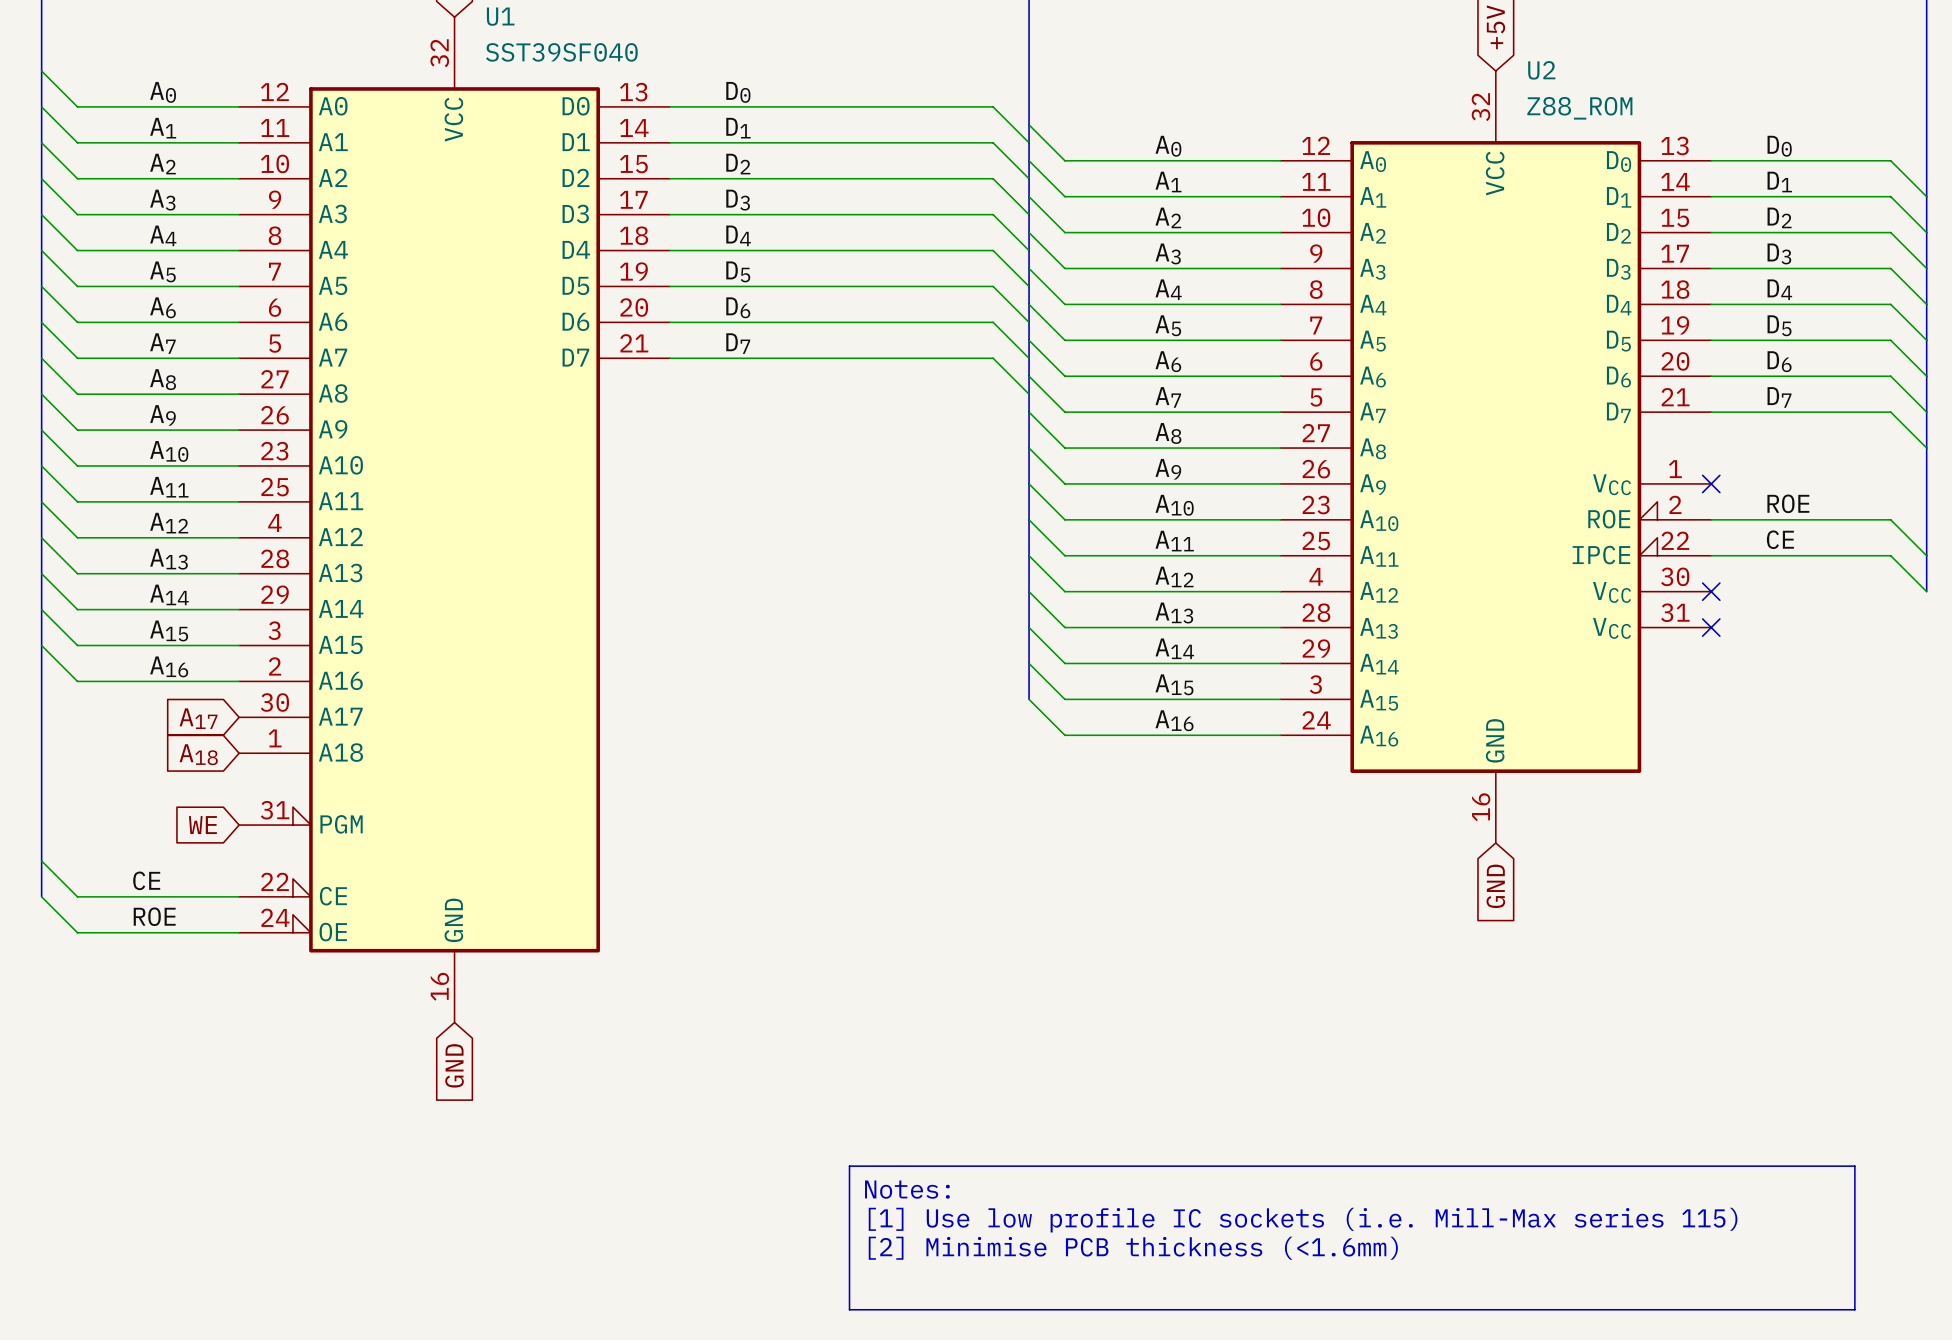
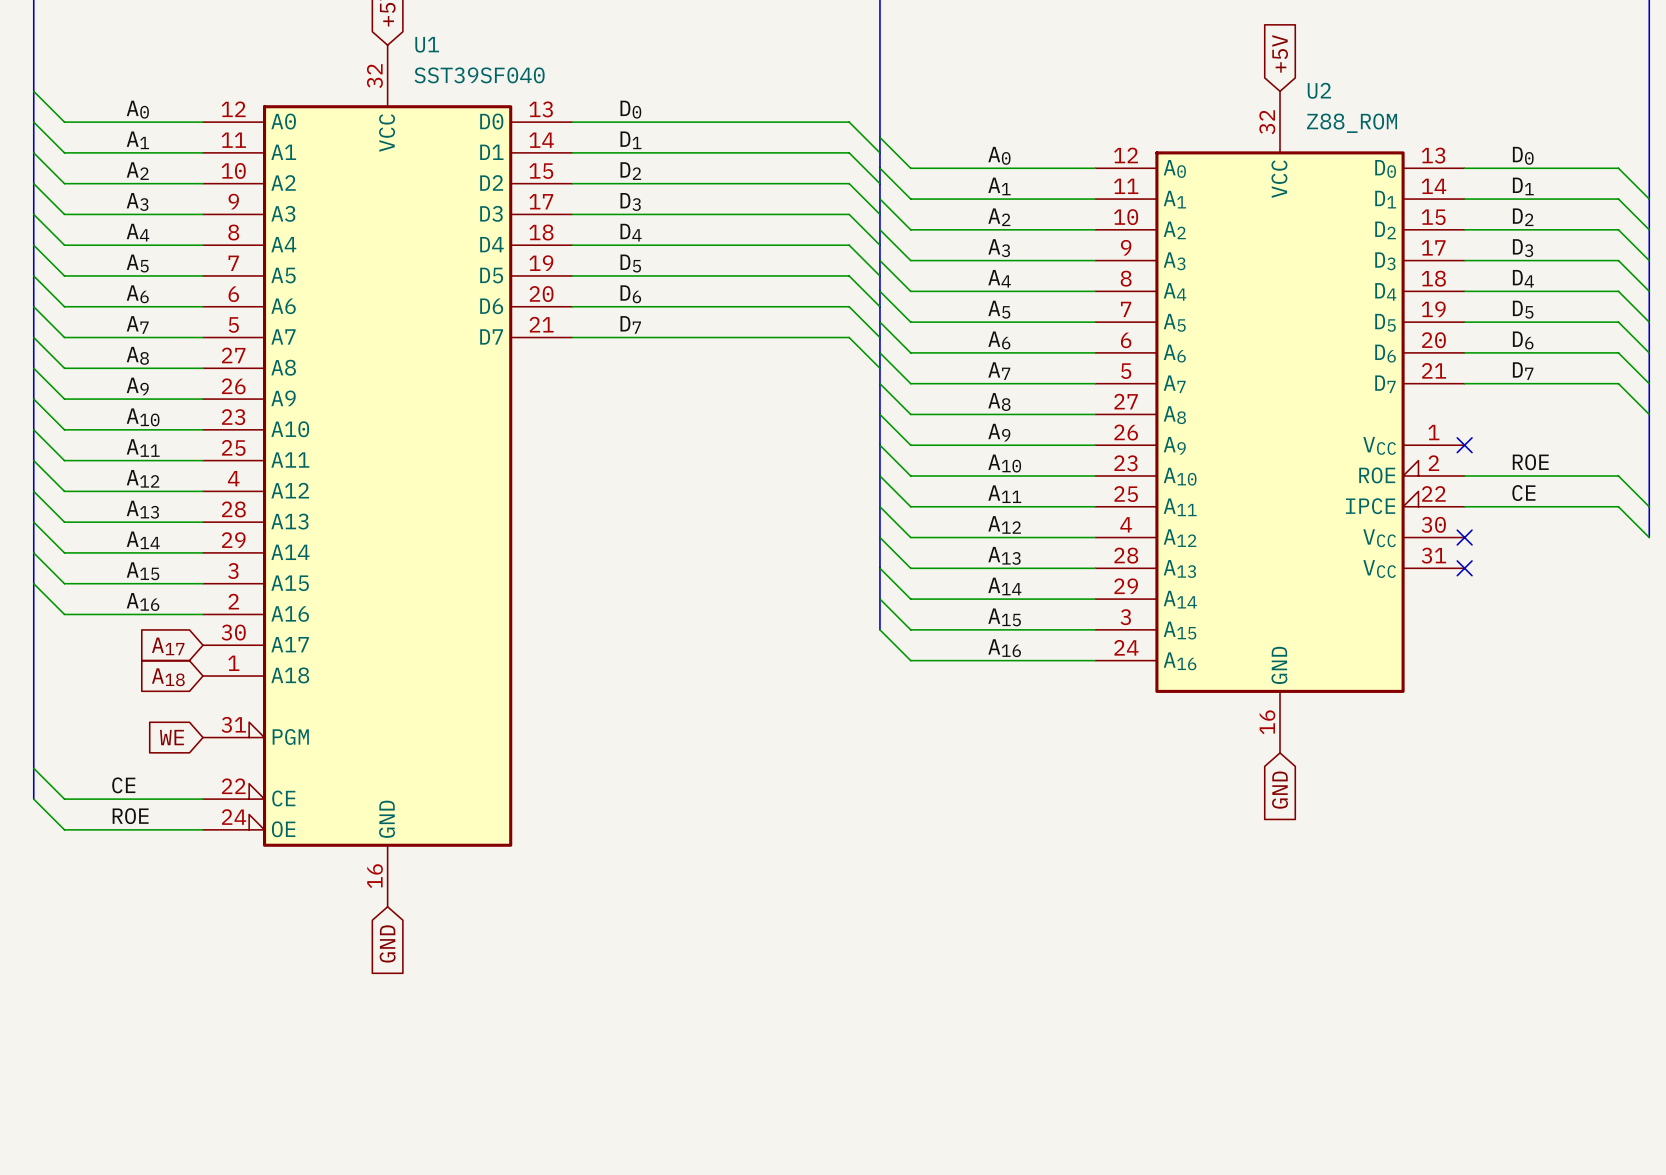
line: (849, 1166) (1854, 1166) (1854, 1309) (849, 1309) (849, 1166) -> none
text: Notes: (907, 1189) -> none
text: [1] Use low profile IC sockets (i.e. Mill-Max series 115) (1303, 1220) -> none
text: [2] Minimise PCB thickness (<1.6mm) (1133, 1248) -> none

